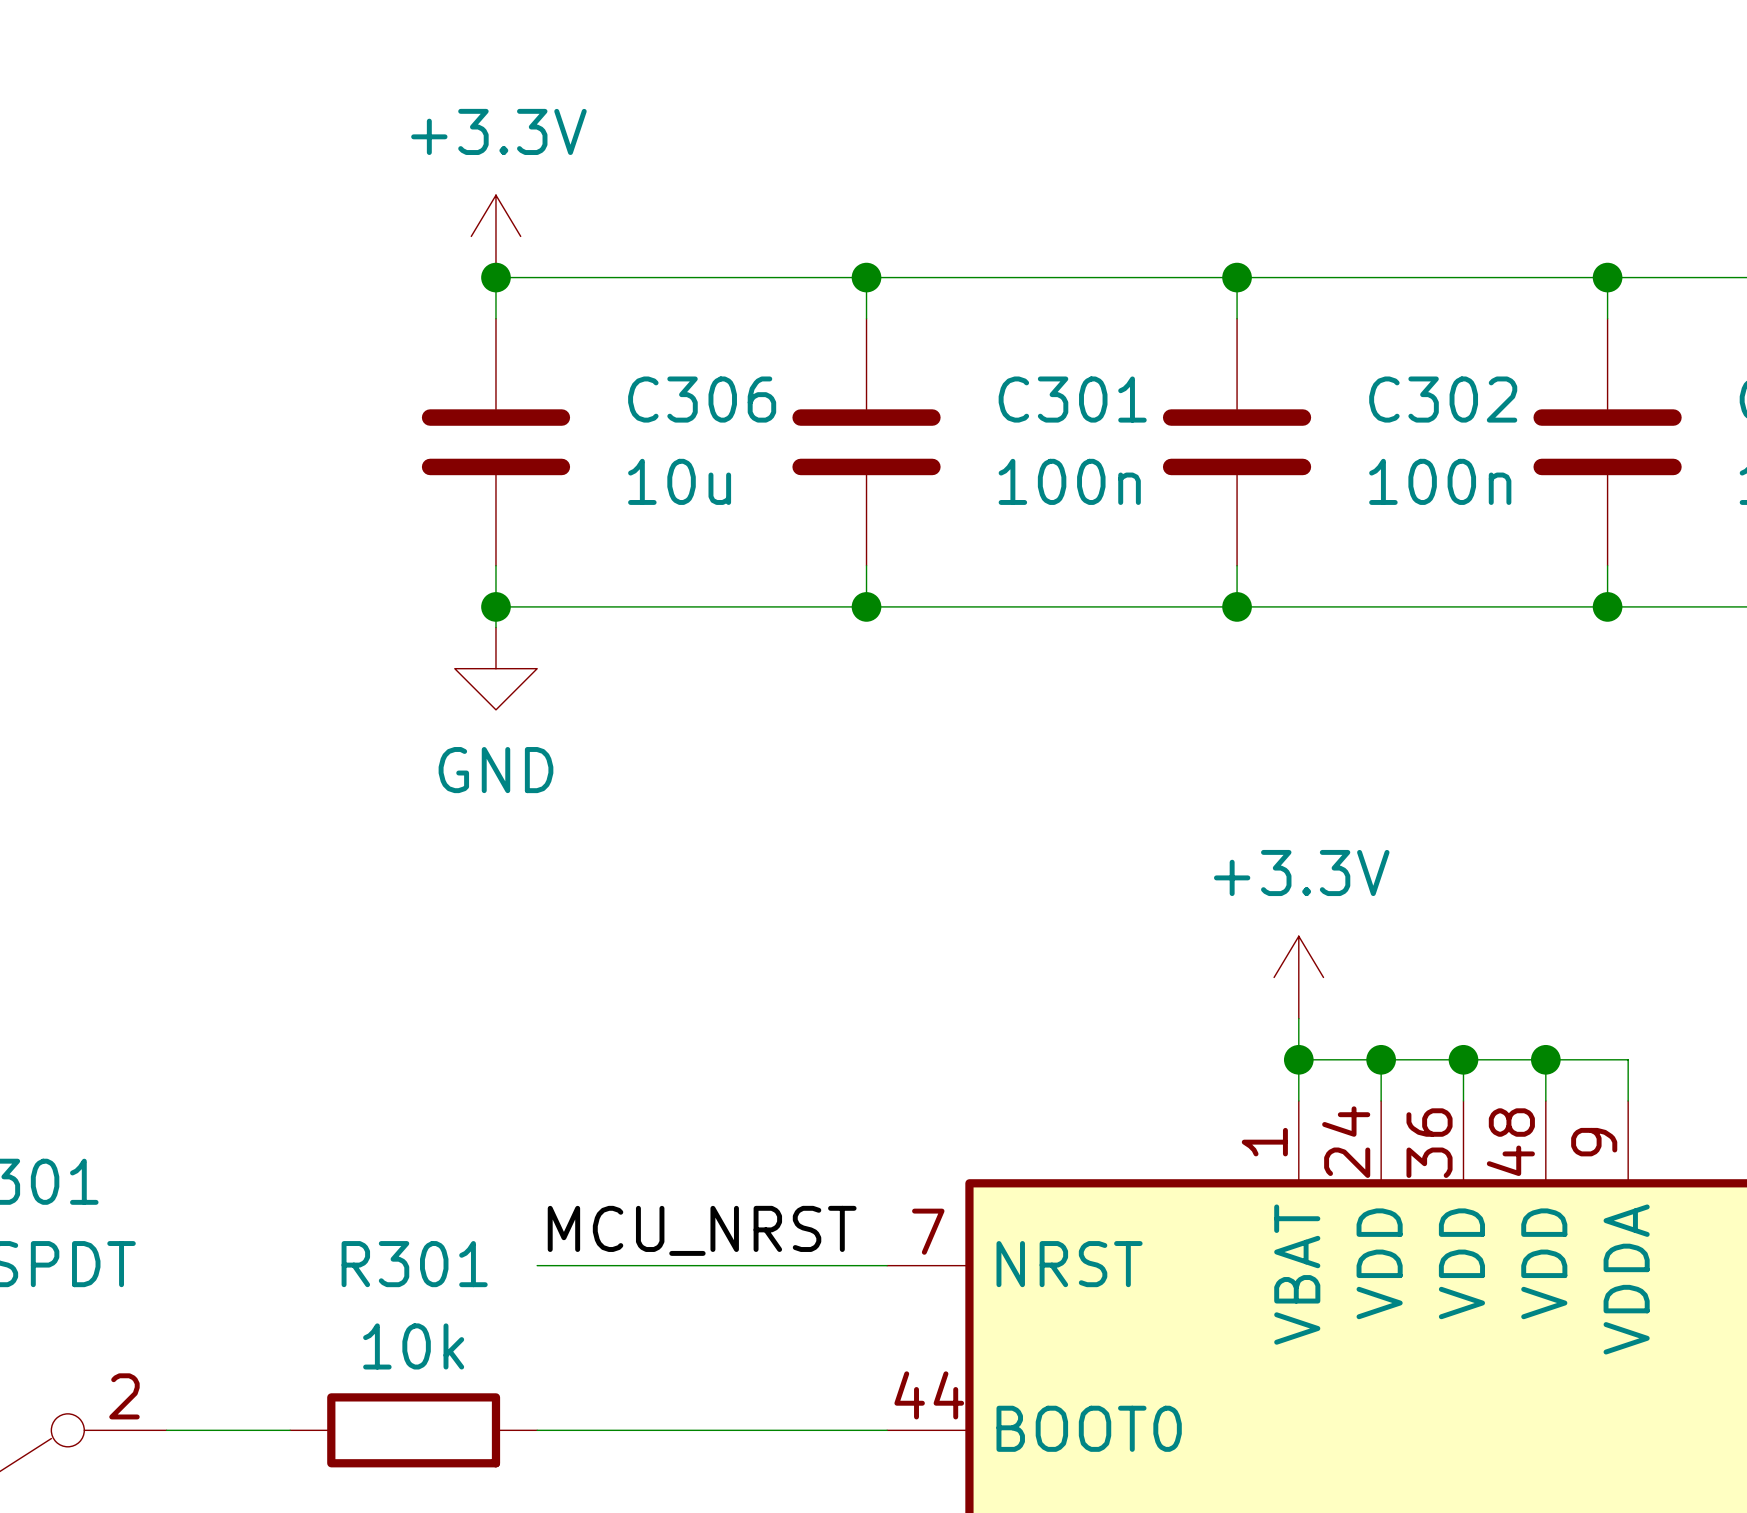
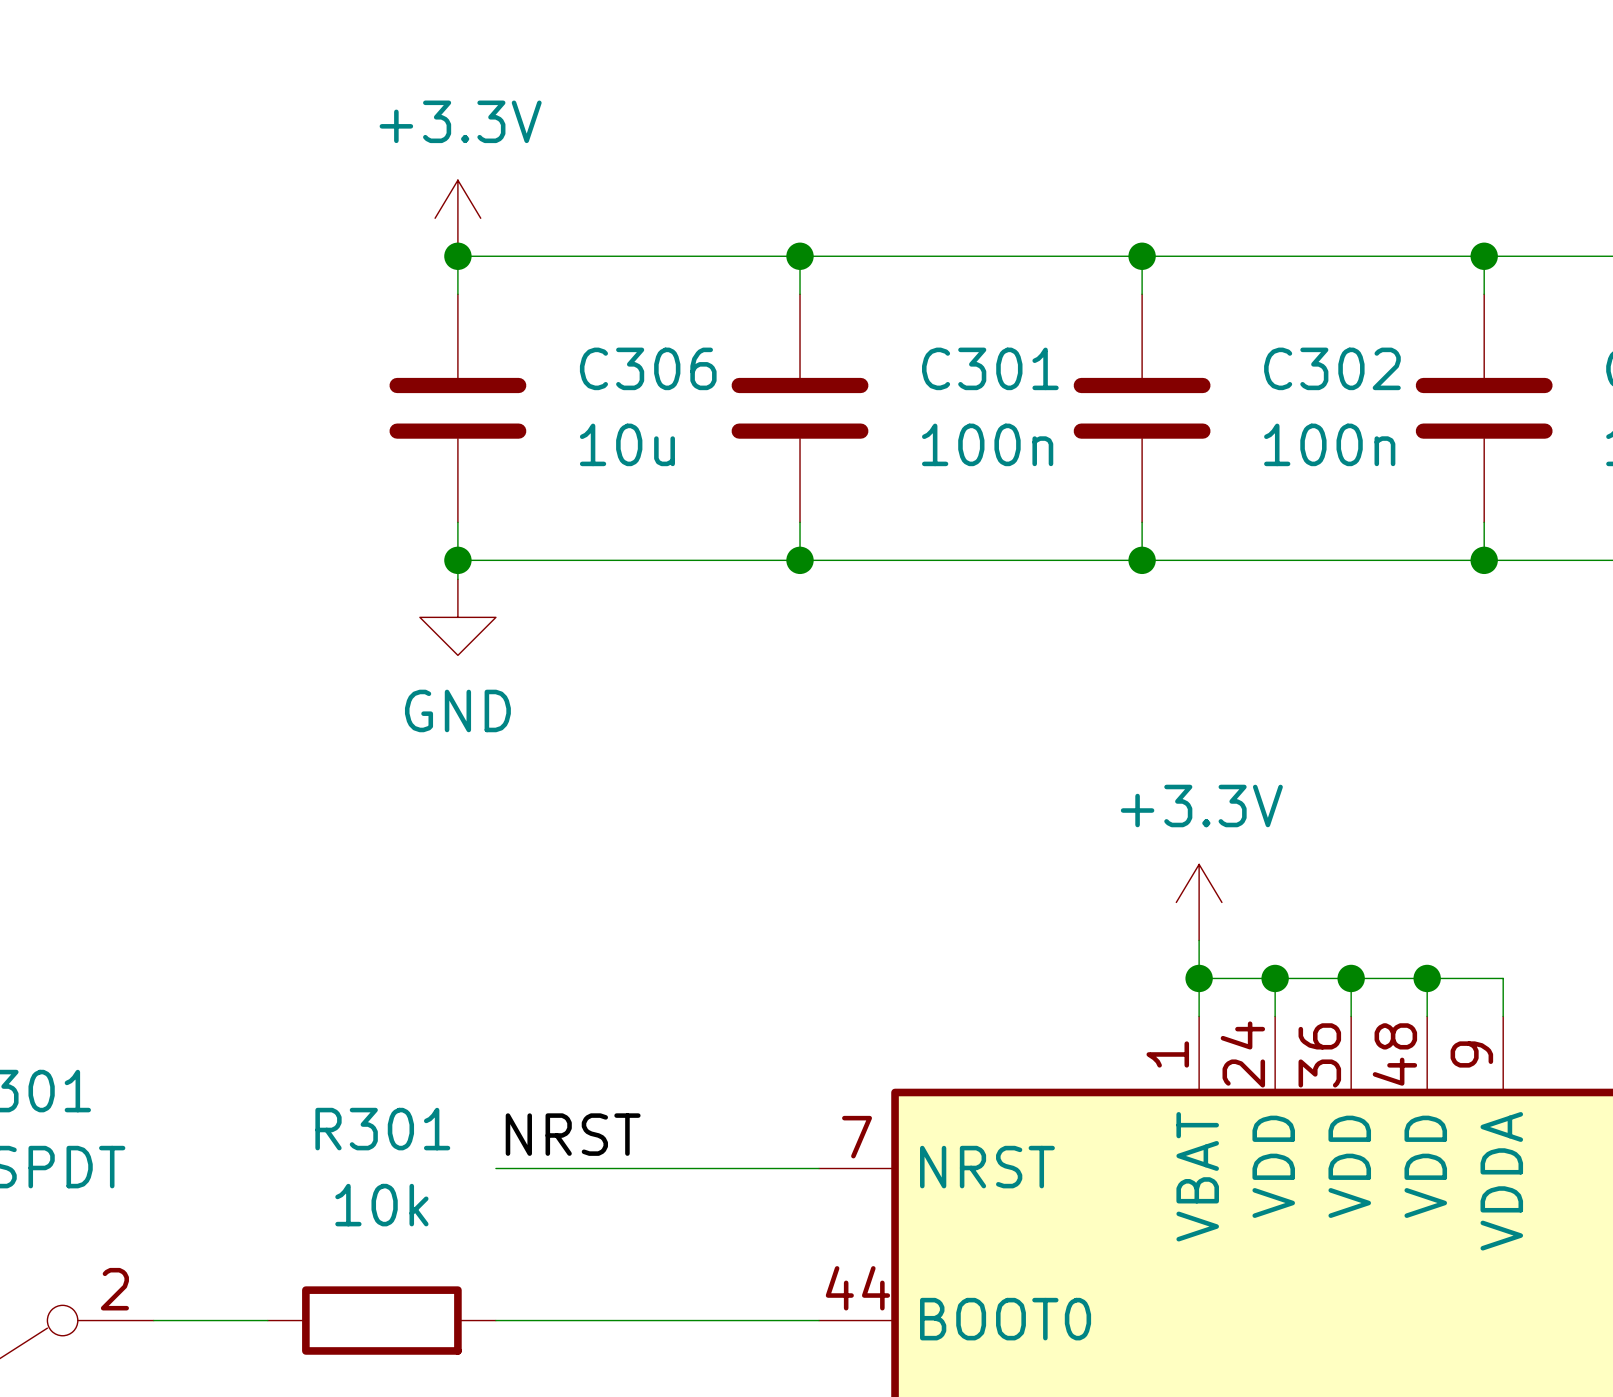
label: MCU_NRST (702, 1230) -> NRST (573, 1134)
R301 name position: R301 (414, 1264) -> R301 (382, 1129)
R301 value position: 10k (413, 1346) -> 10k (381, 1205)

